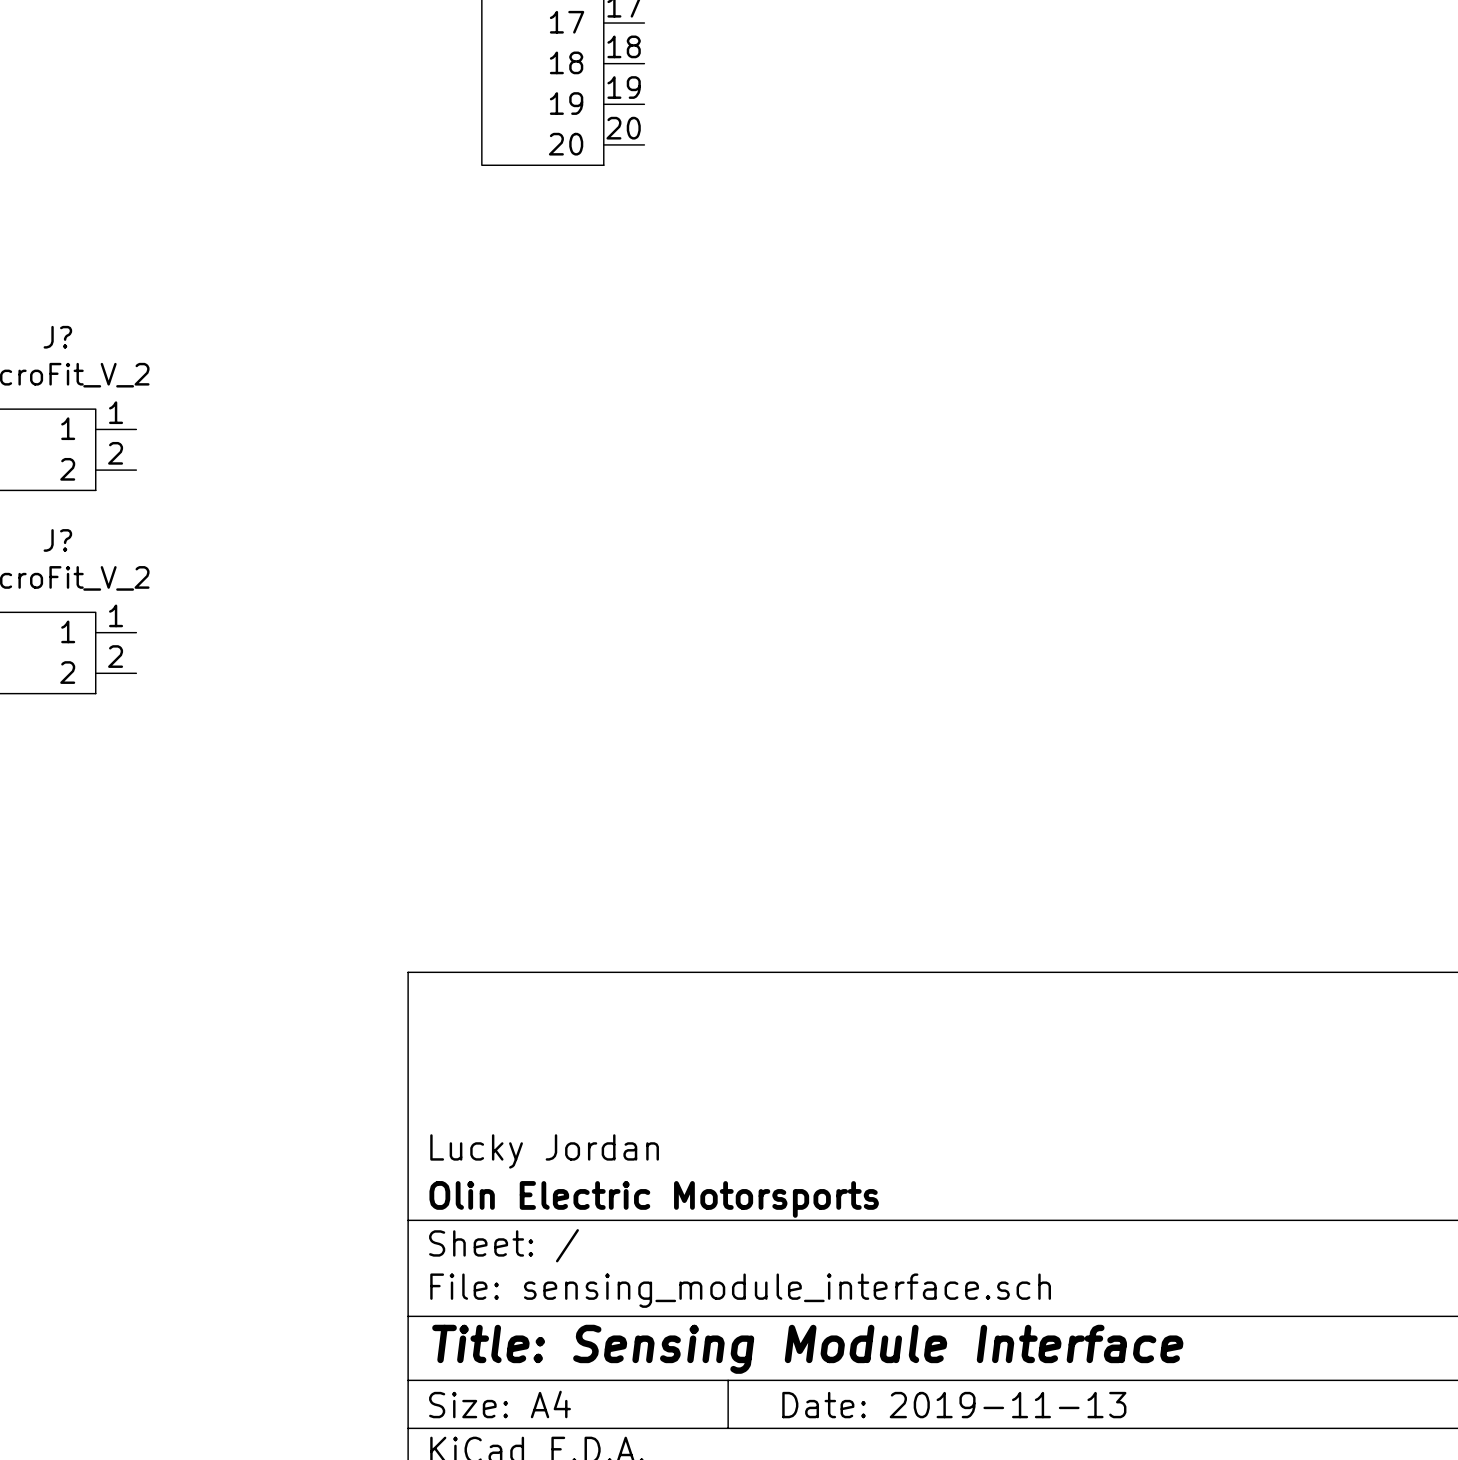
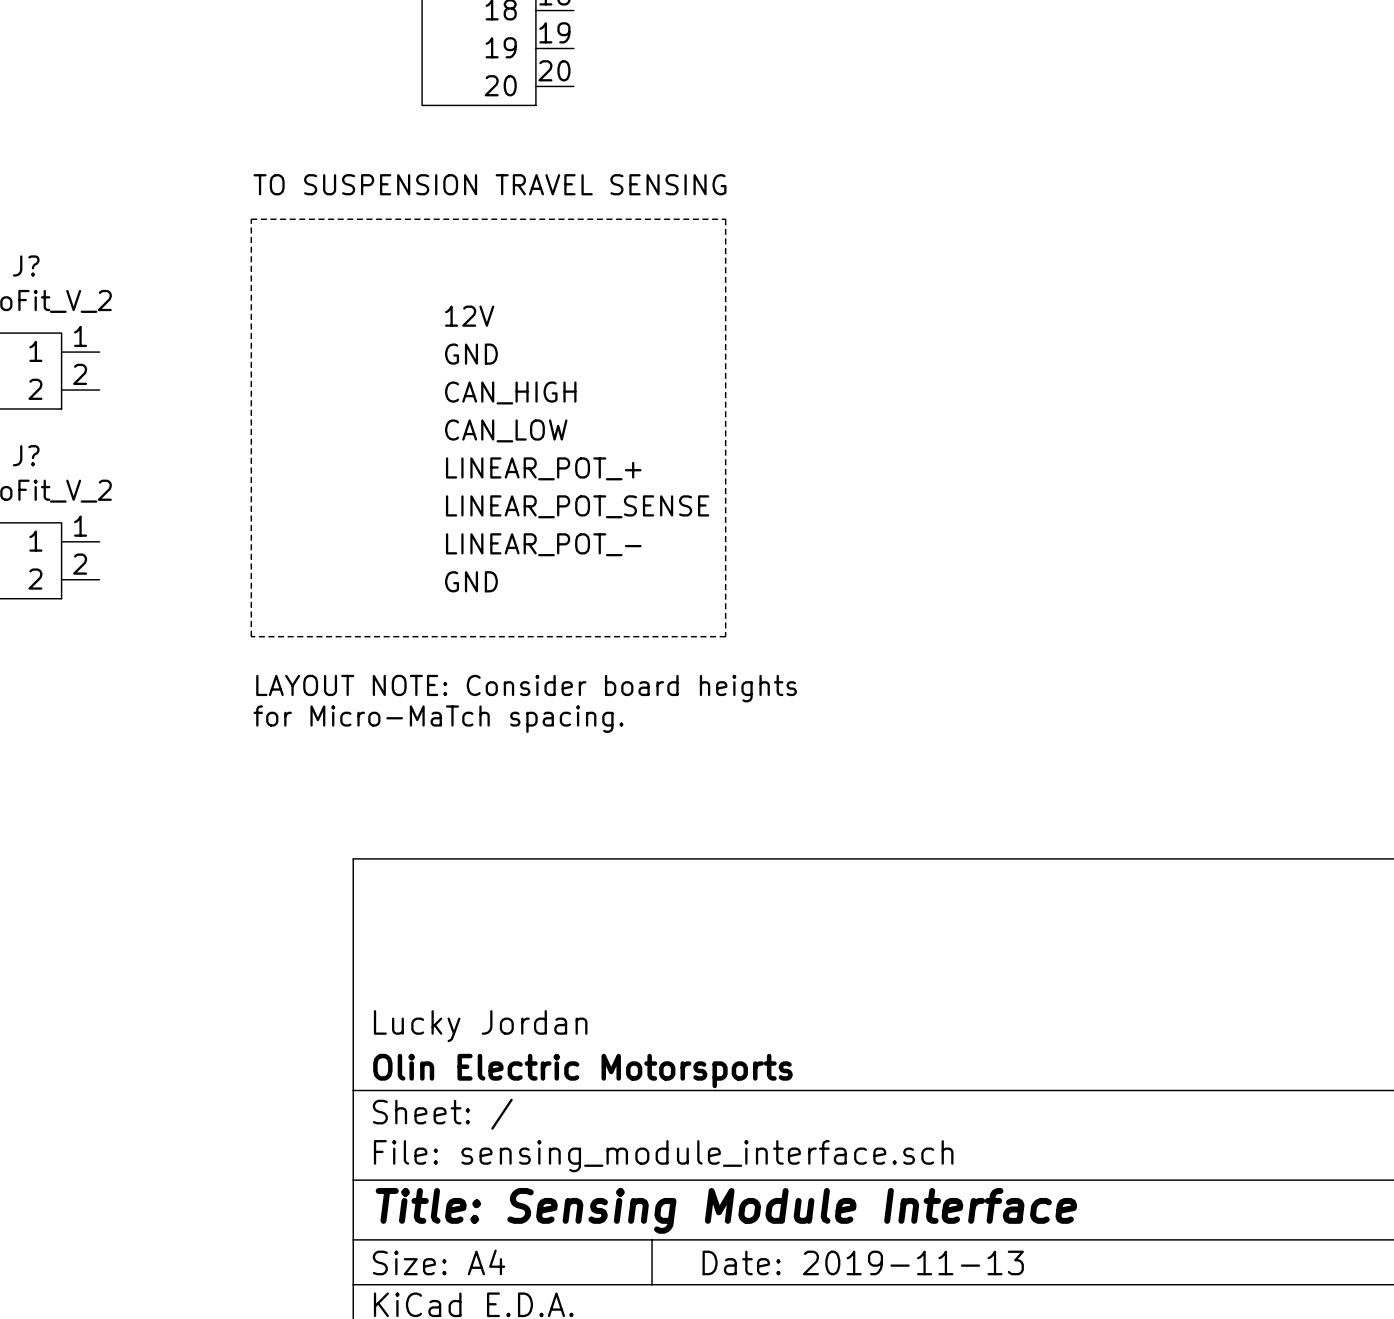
text: none -> TO SUSPENSION TRAVEL SENSING (489, 184)
line: none -> (251, 219) (251, 636) (725, 636) (725, 219) (251, 219)
label: none -> 12V (469, 316)
label: none -> GND (471, 354)
label: none -> CAN_HIGH (510, 392)
label: none -> CAN_LOW (506, 430)
label: none -> LINEAR_POT_+ (543, 468)
label: none -> LINEAR_POT_SENSE (577, 506)
label: none -> LINEAR_POT_- (543, 544)
label: none -> GND (471, 581)
text: none -> LAYOUT NOTE: Consider board heights (526, 688)
text: none -> for Micro-MaTch spacing. (438, 719)

